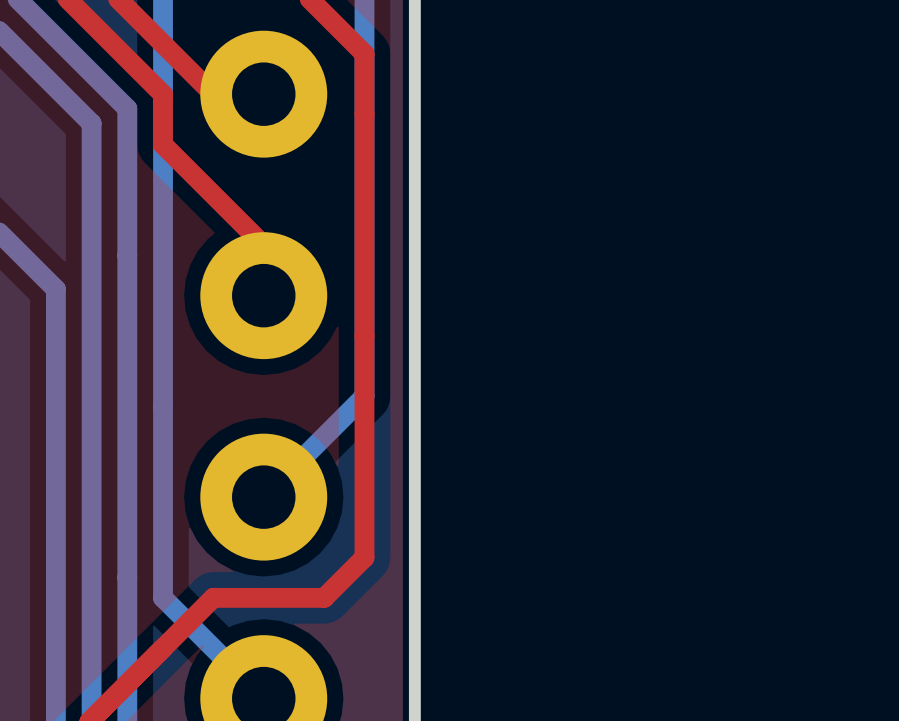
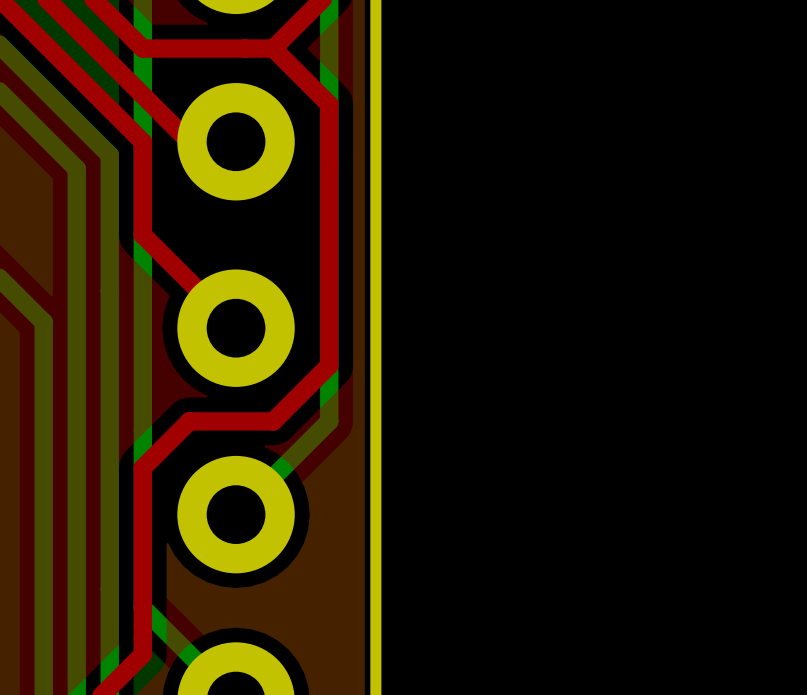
top track: (163, 144) (263, 245) (263, 295) -> (142, 188) (142, 234) (236, 328)
top track: (364, 335) (364, 557) (324, 597) (213, 597) (163, 648) -> (329, 365) (273, 421) (189, 421) (142, 468) (142, 654)

